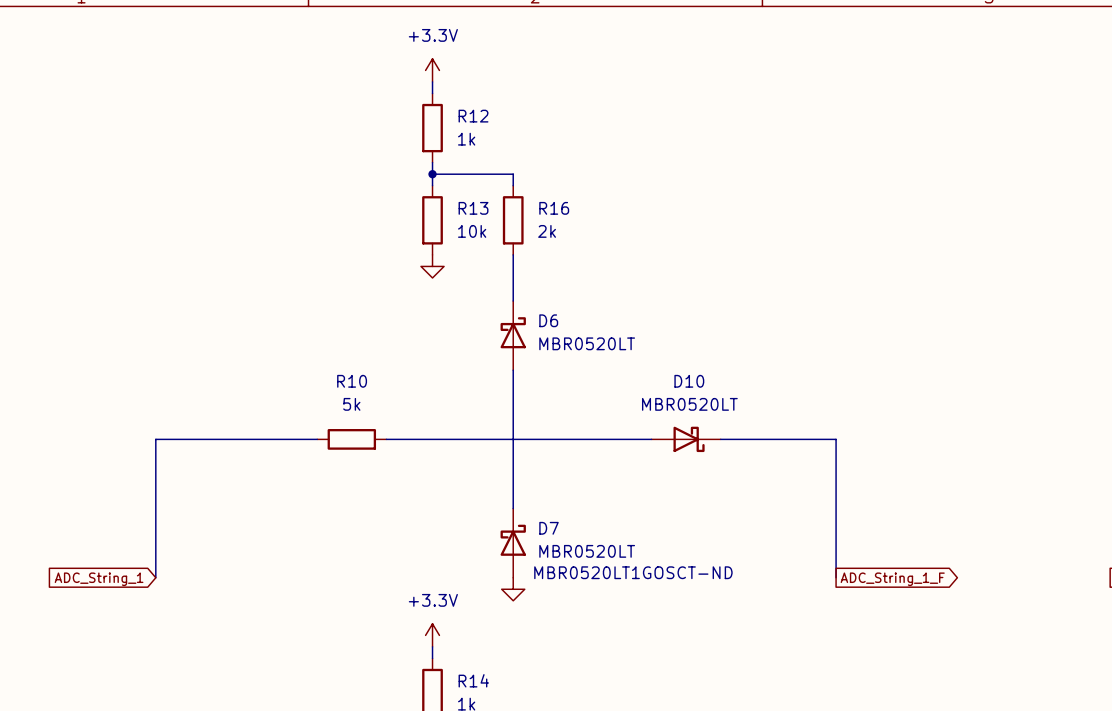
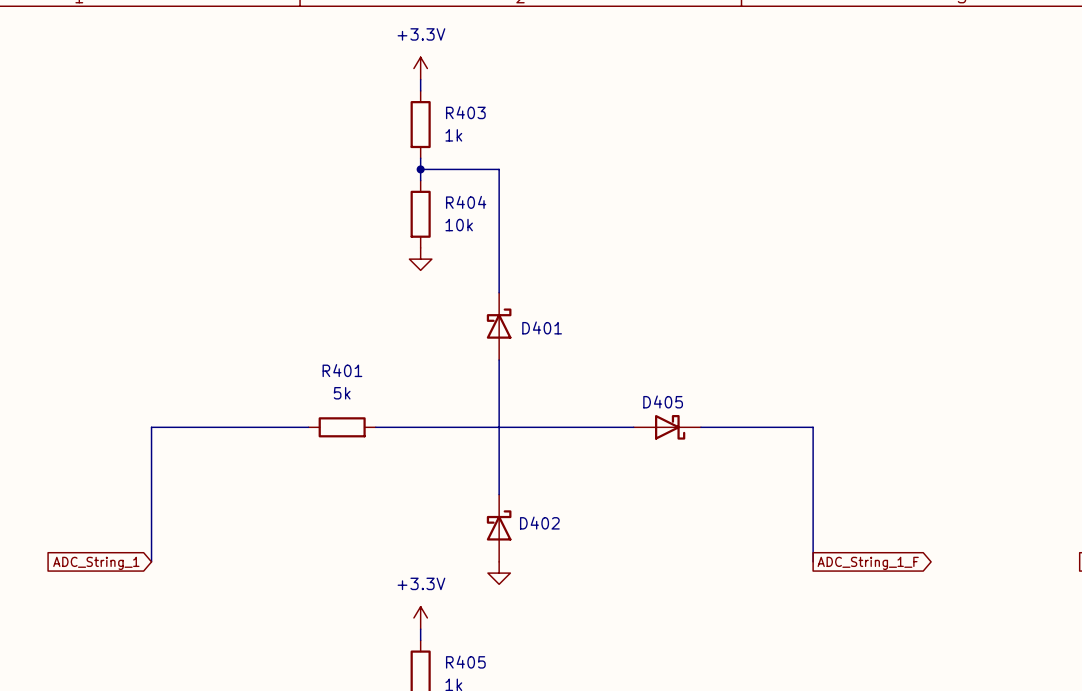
R12 name: R12 (473, 116) -> R403 (465, 112)
wire: none -> (499, 180) (499, 247)
R13 name: R13 (473, 208) -> R404 (466, 202)
R16: 2k (513, 220) -> none
D6 name: D6 (548, 320) -> D401 (542, 327)
D6 value: MBR0520LT (587, 343) -> none
R10 name: R10 (352, 381) -> R401 (342, 370)
D10 name: D10 (689, 381) -> D405 (663, 401)
D10 value: MBR0520LT (689, 404) -> none
D7 name: D7 (549, 528) -> D402 (539, 523)
D7 value: MBR0520LT (587, 551) -> none
text: MBR0520LT1GOSCT-ND (633, 572) -> none
R14 name: R14 (473, 680) -> R405 (465, 662)

